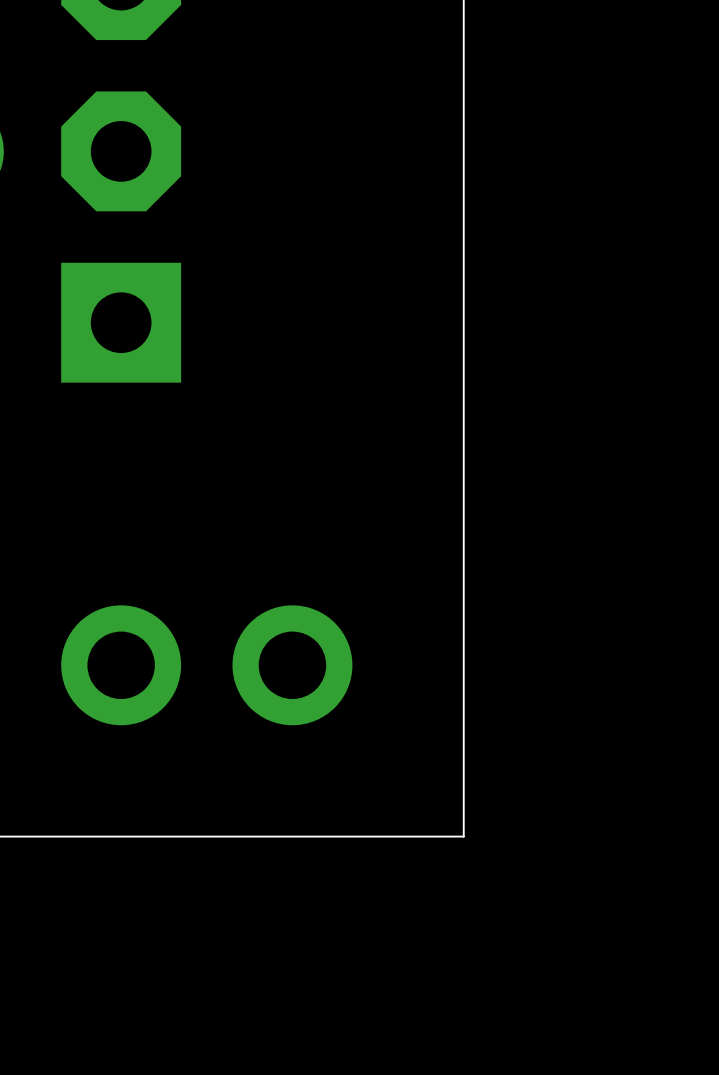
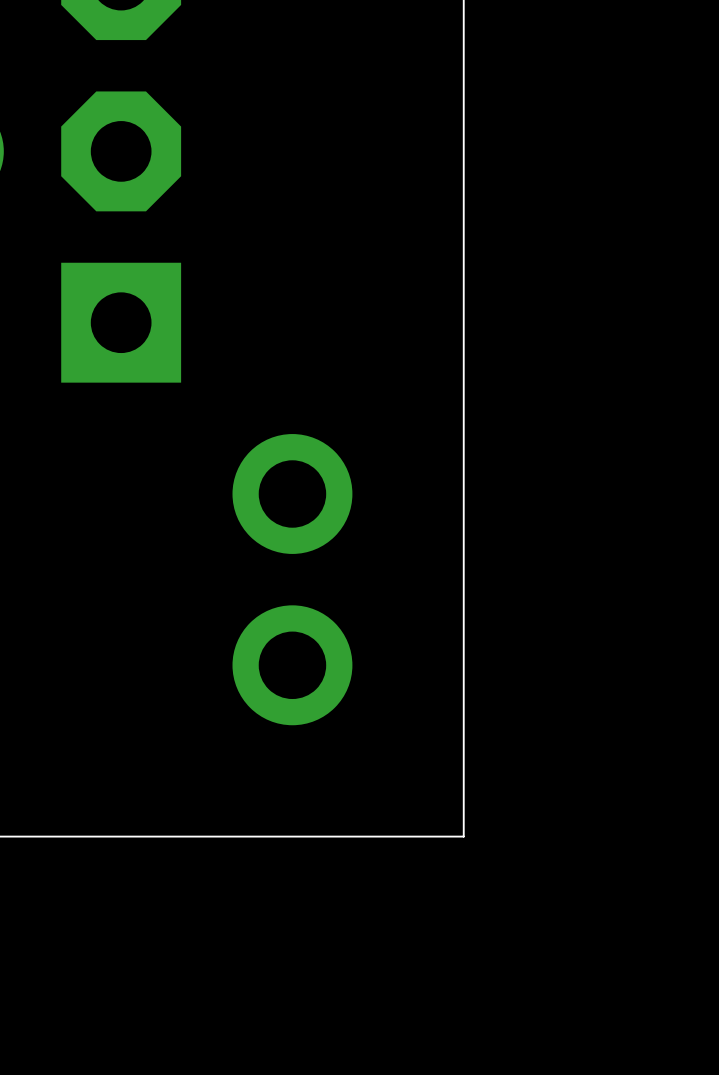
part rotation: 0° (206, 665) -> 90° clockwise (292, 579)

